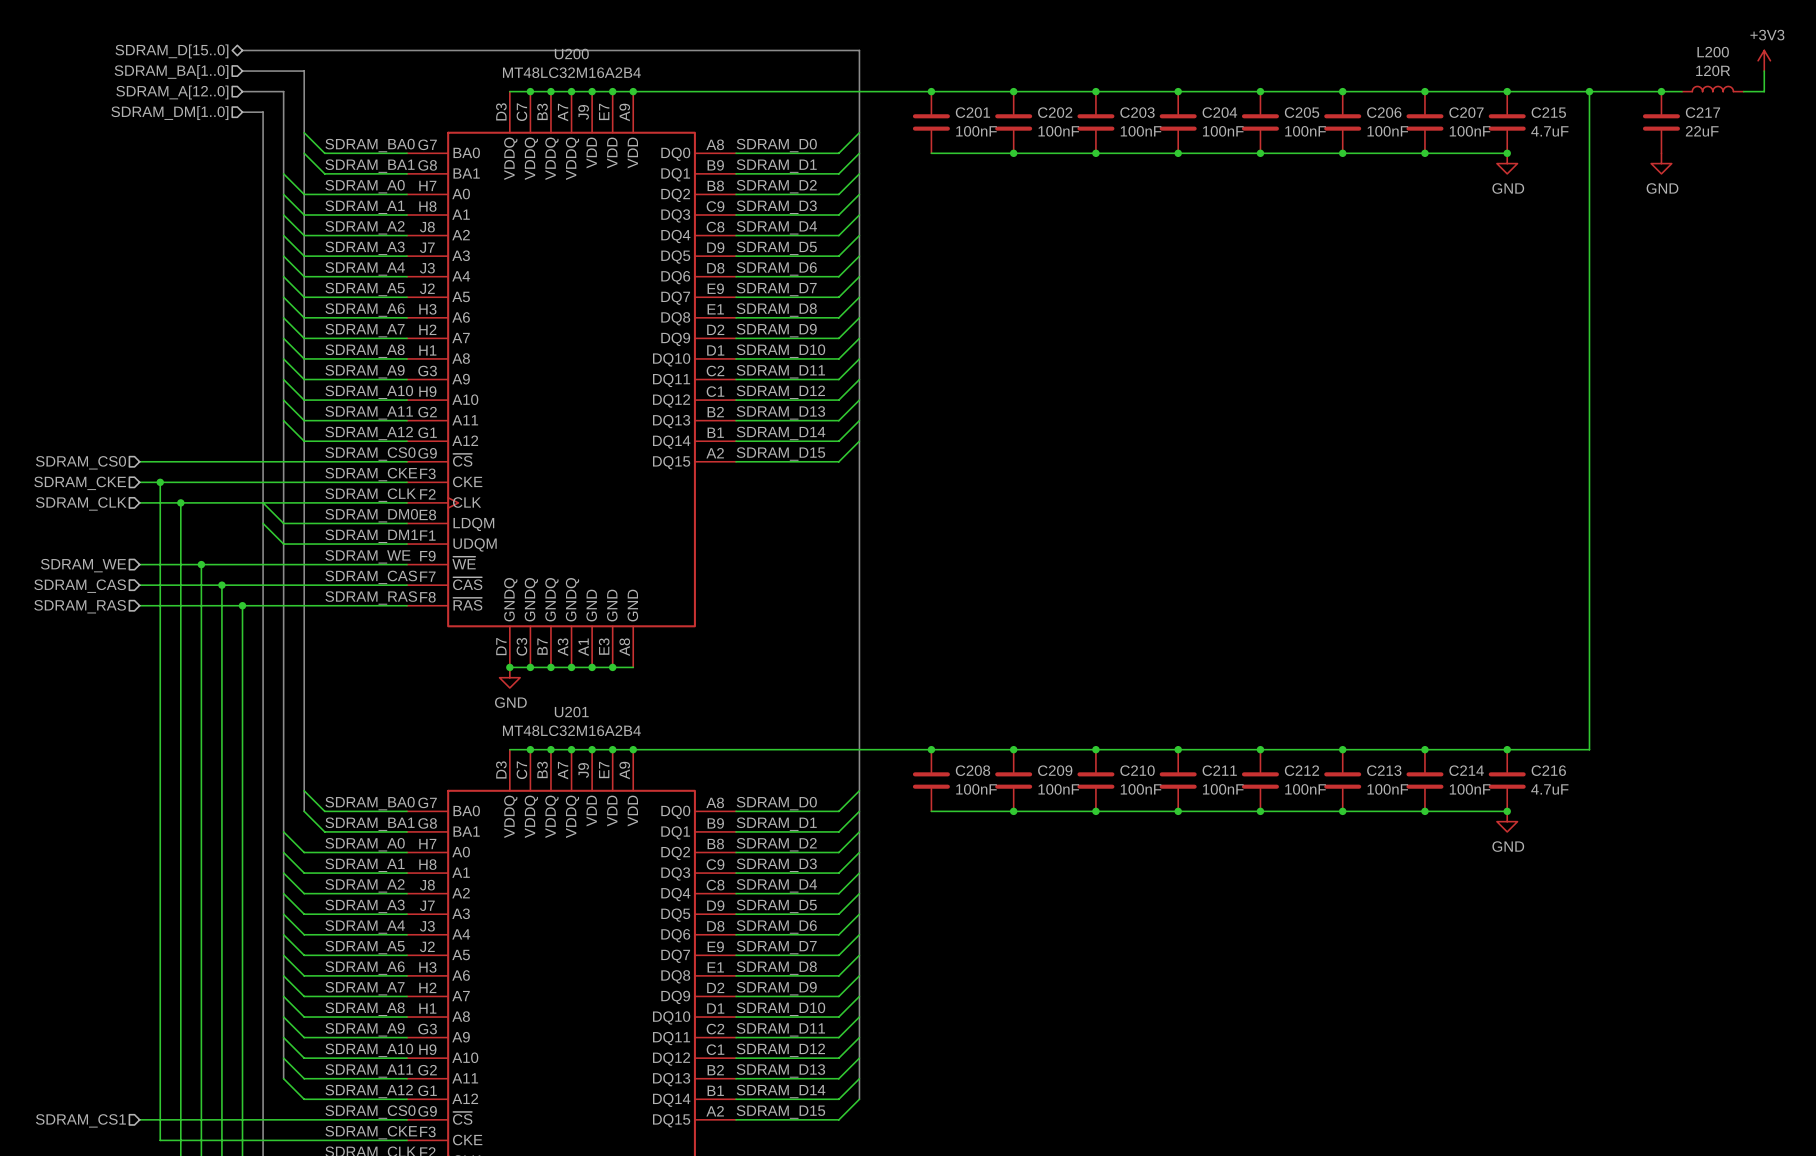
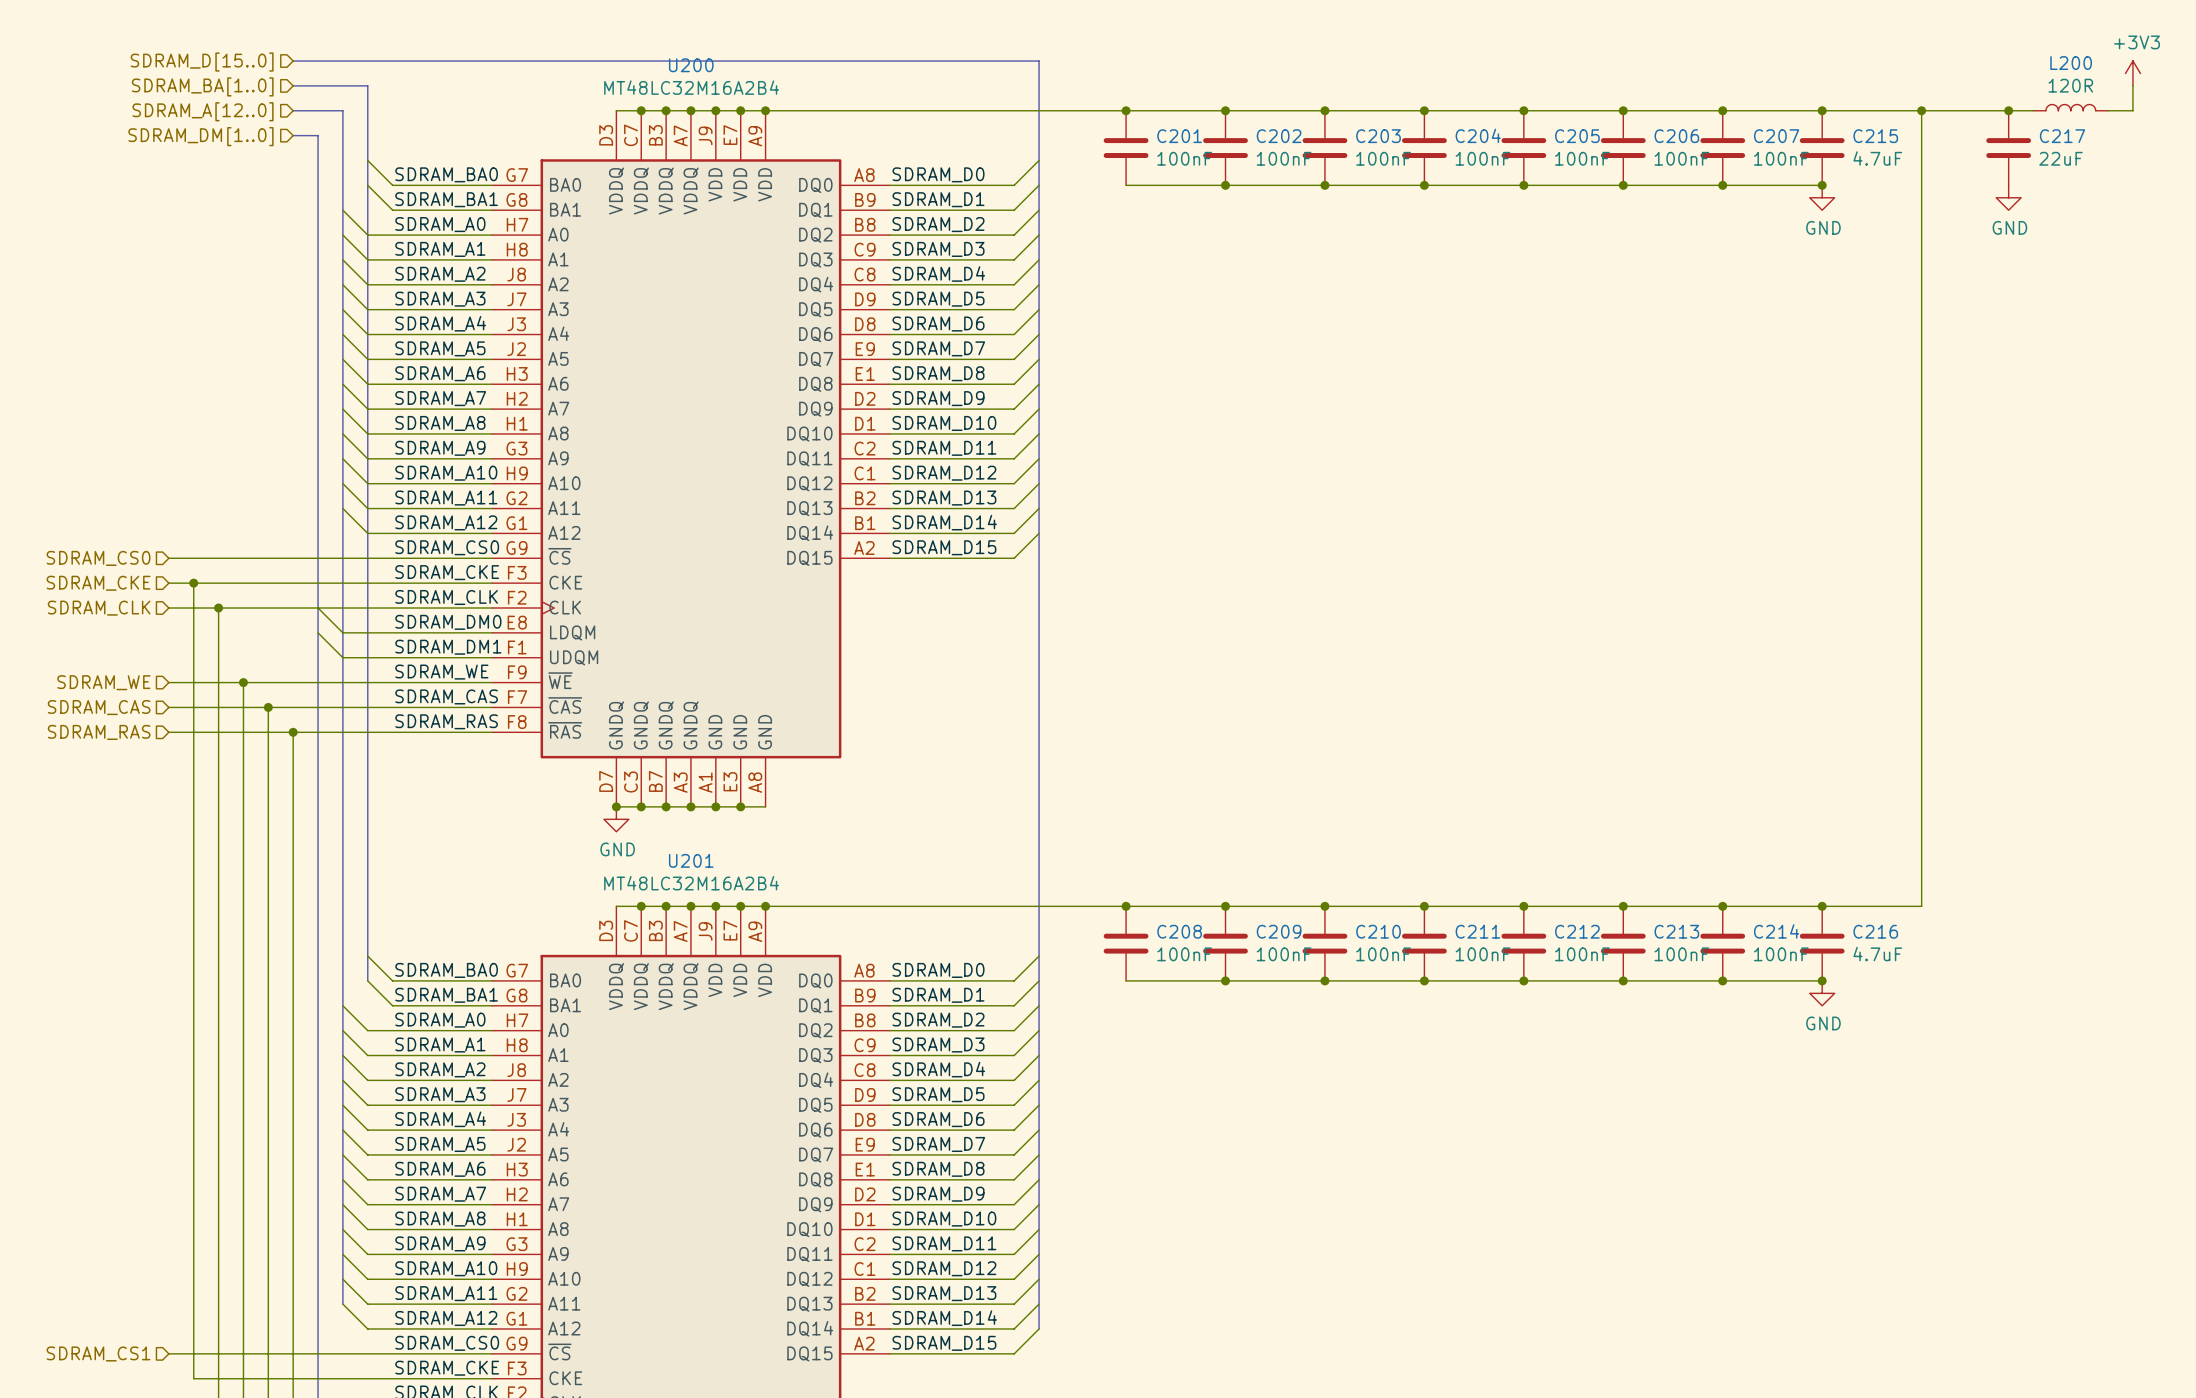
hierarchical label shape: bidirectional (171, 51) -> input (202, 62)

